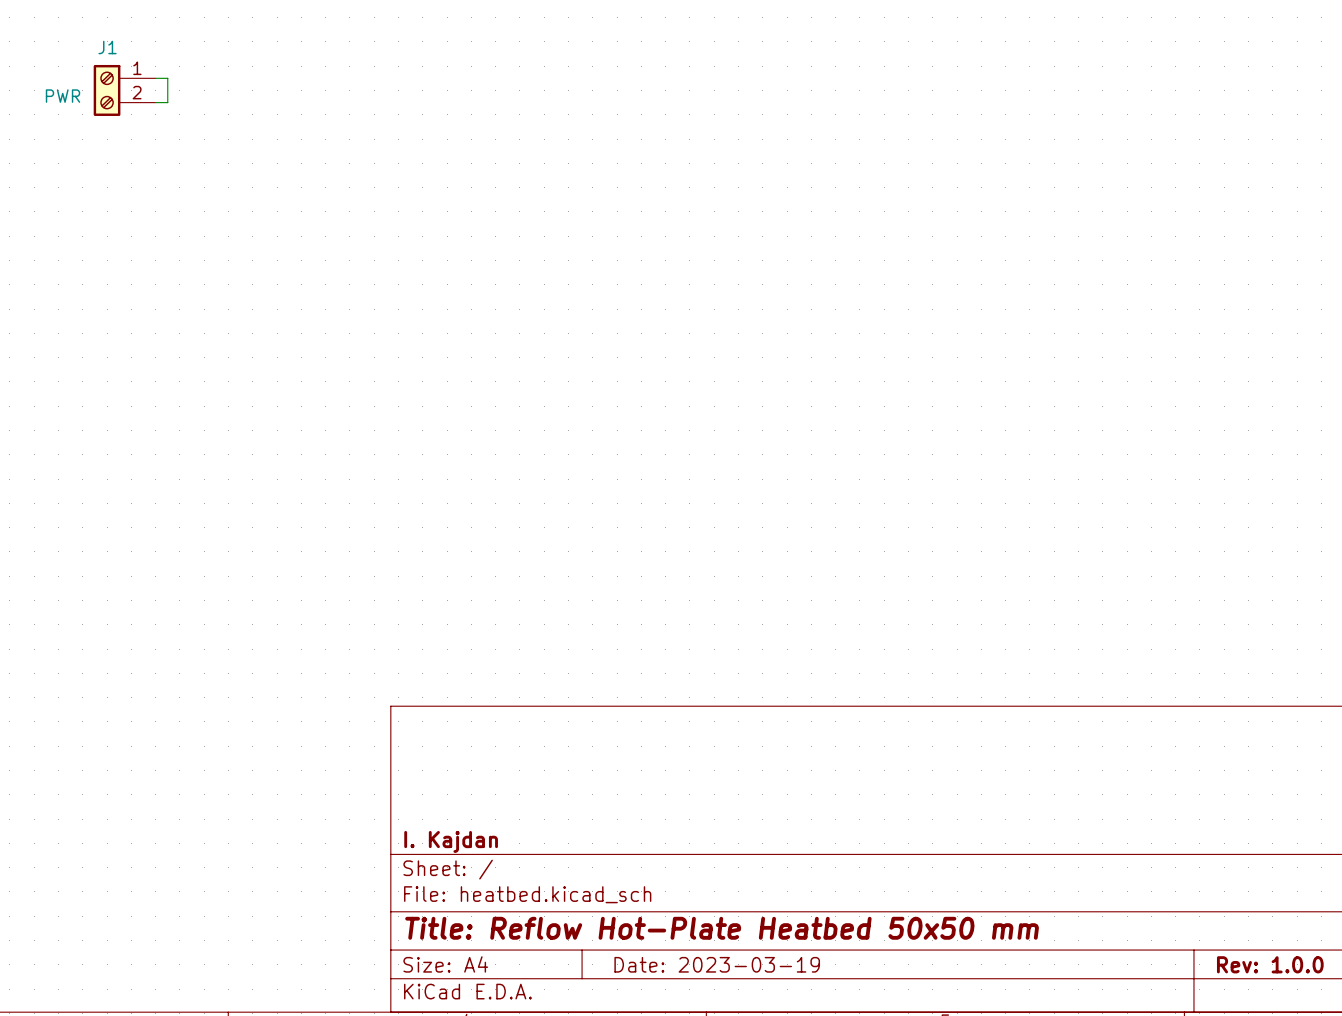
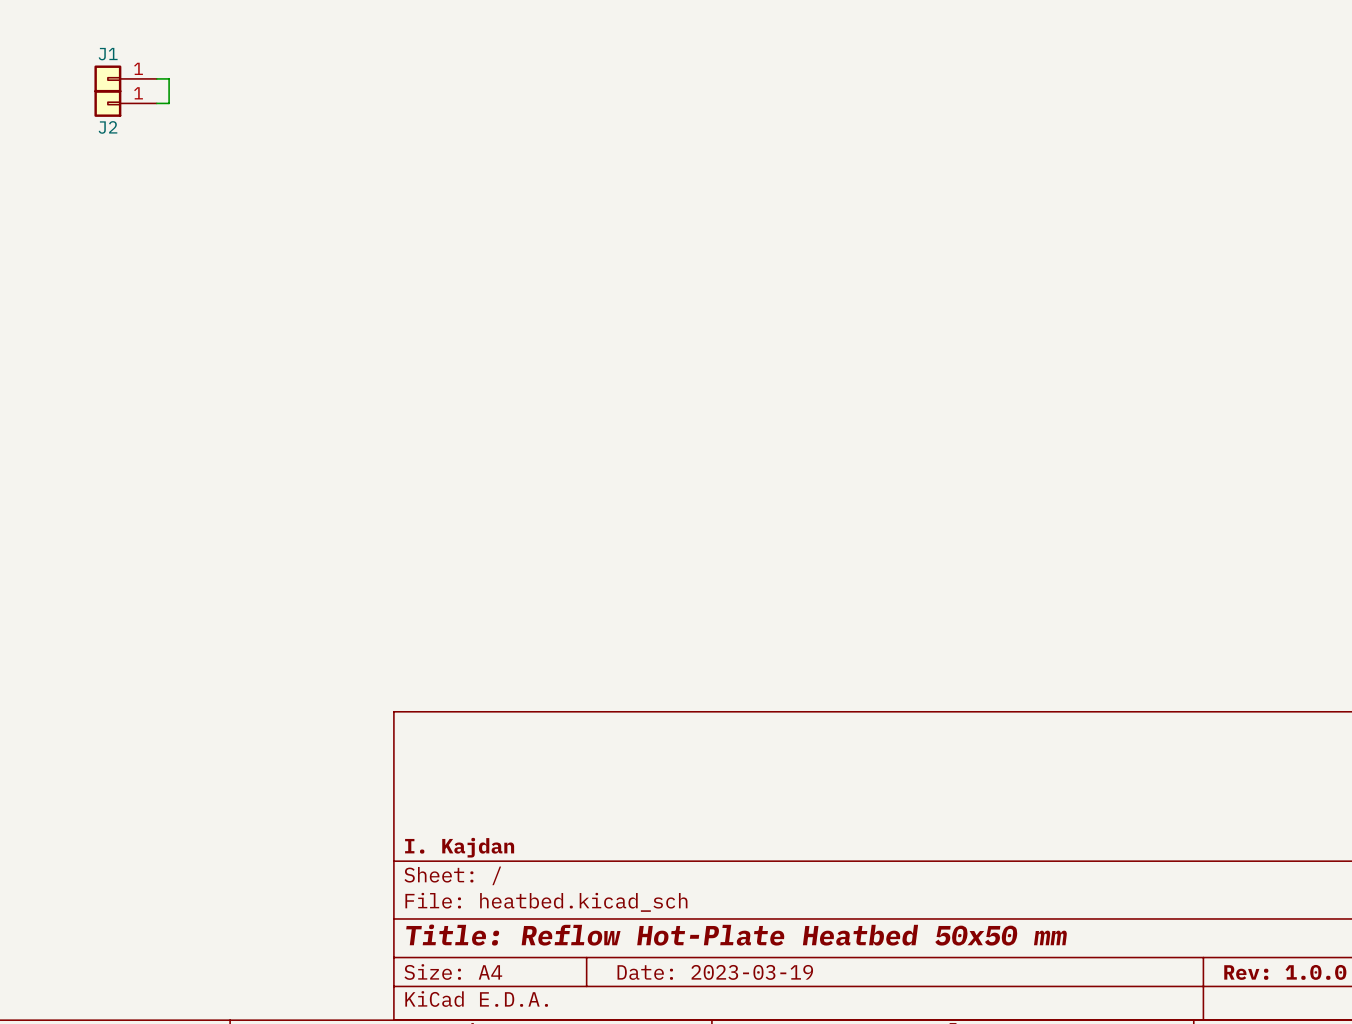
J1 symbol: [93, 64, 156, 116] -> [94, 65, 157, 93]
J1 value: PWR (63, 96) -> none
J2: none -> (125, 103)

